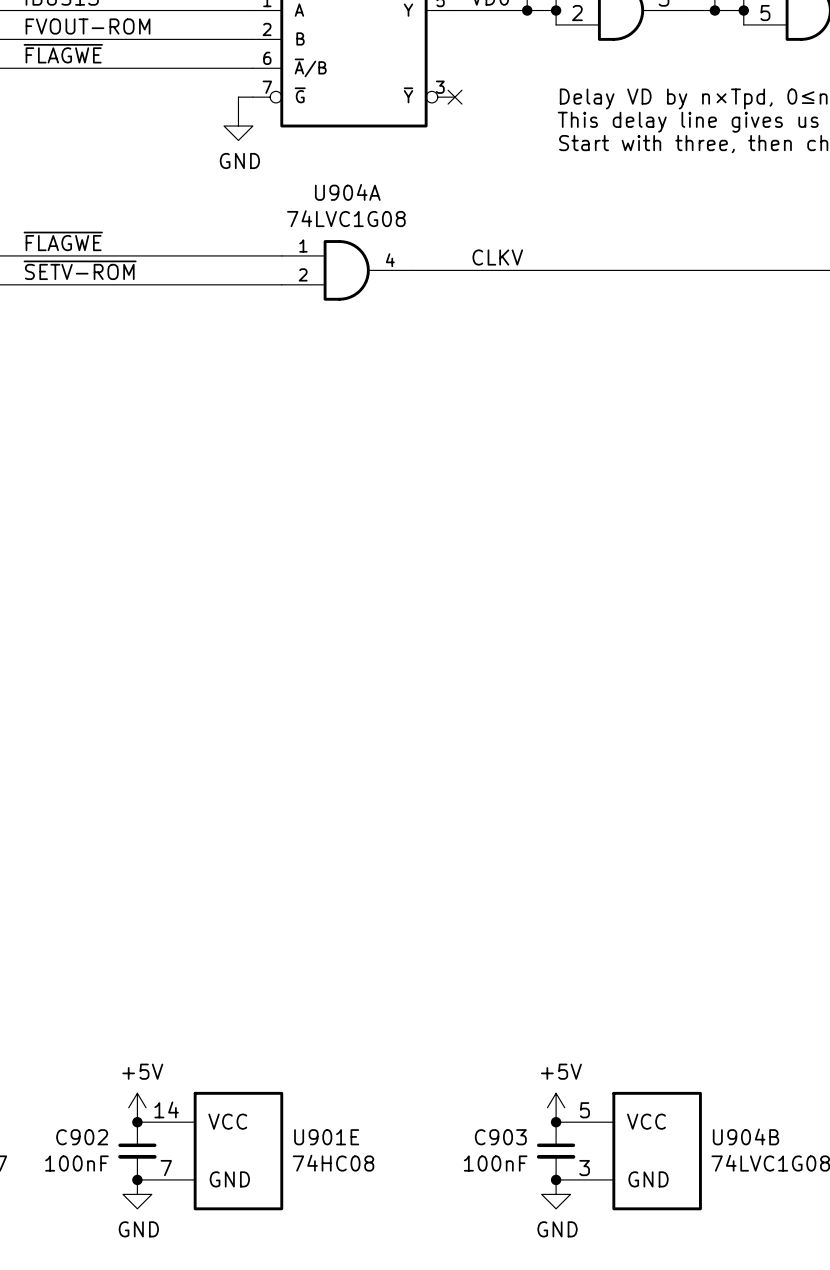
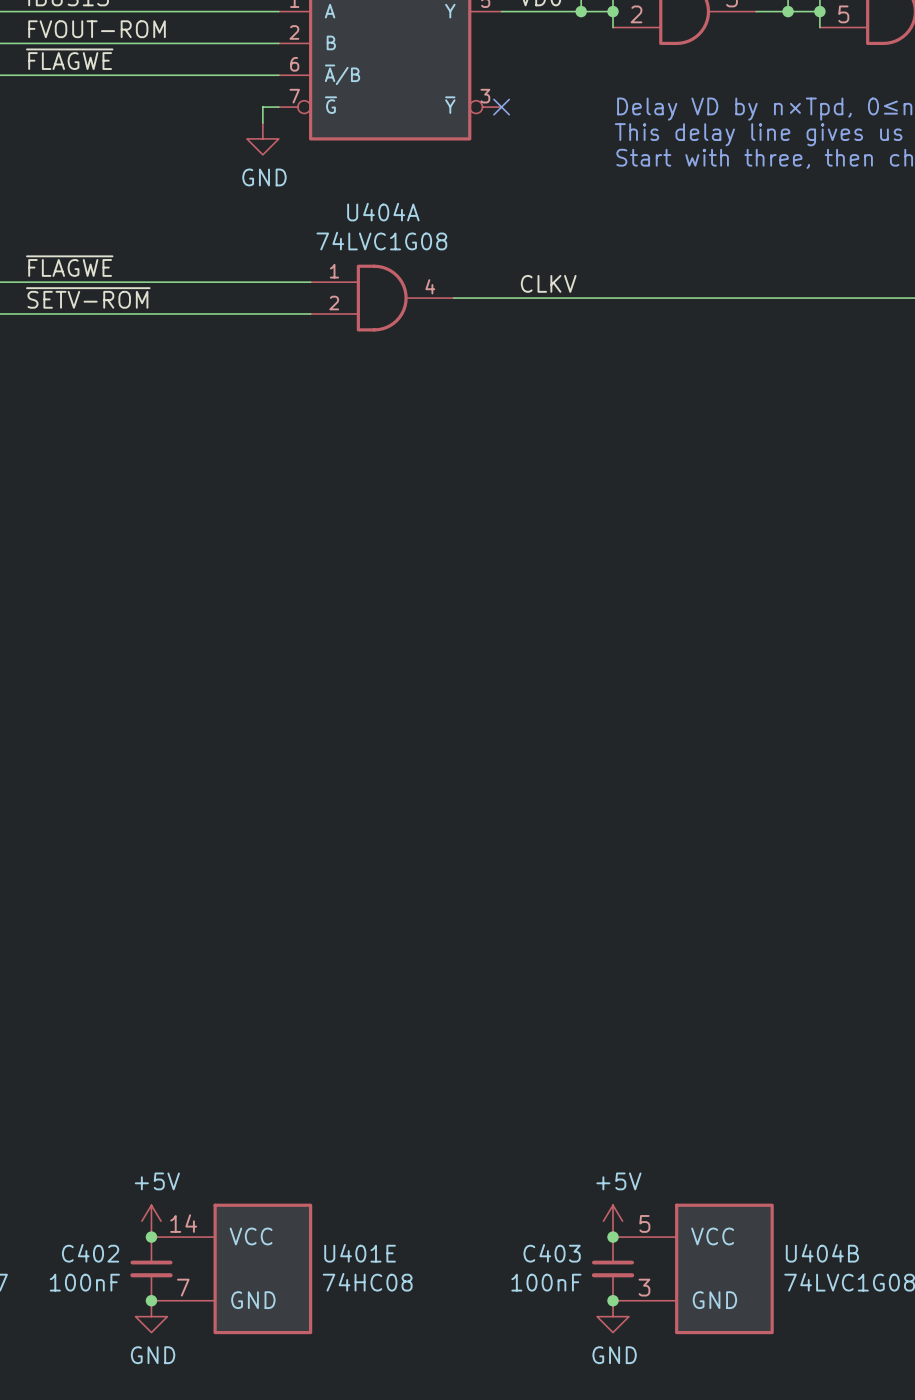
U904A name: U904A (347, 192) -> U404A (383, 212)
U904B name: U904B (746, 1136) -> U404B (822, 1253)
C902 name: C902 (82, 1137) -> C402 (90, 1253)
U901E name: U901E (326, 1137) -> U401E (360, 1253)
C903 name: C903 (500, 1137) -> C403 (552, 1253)

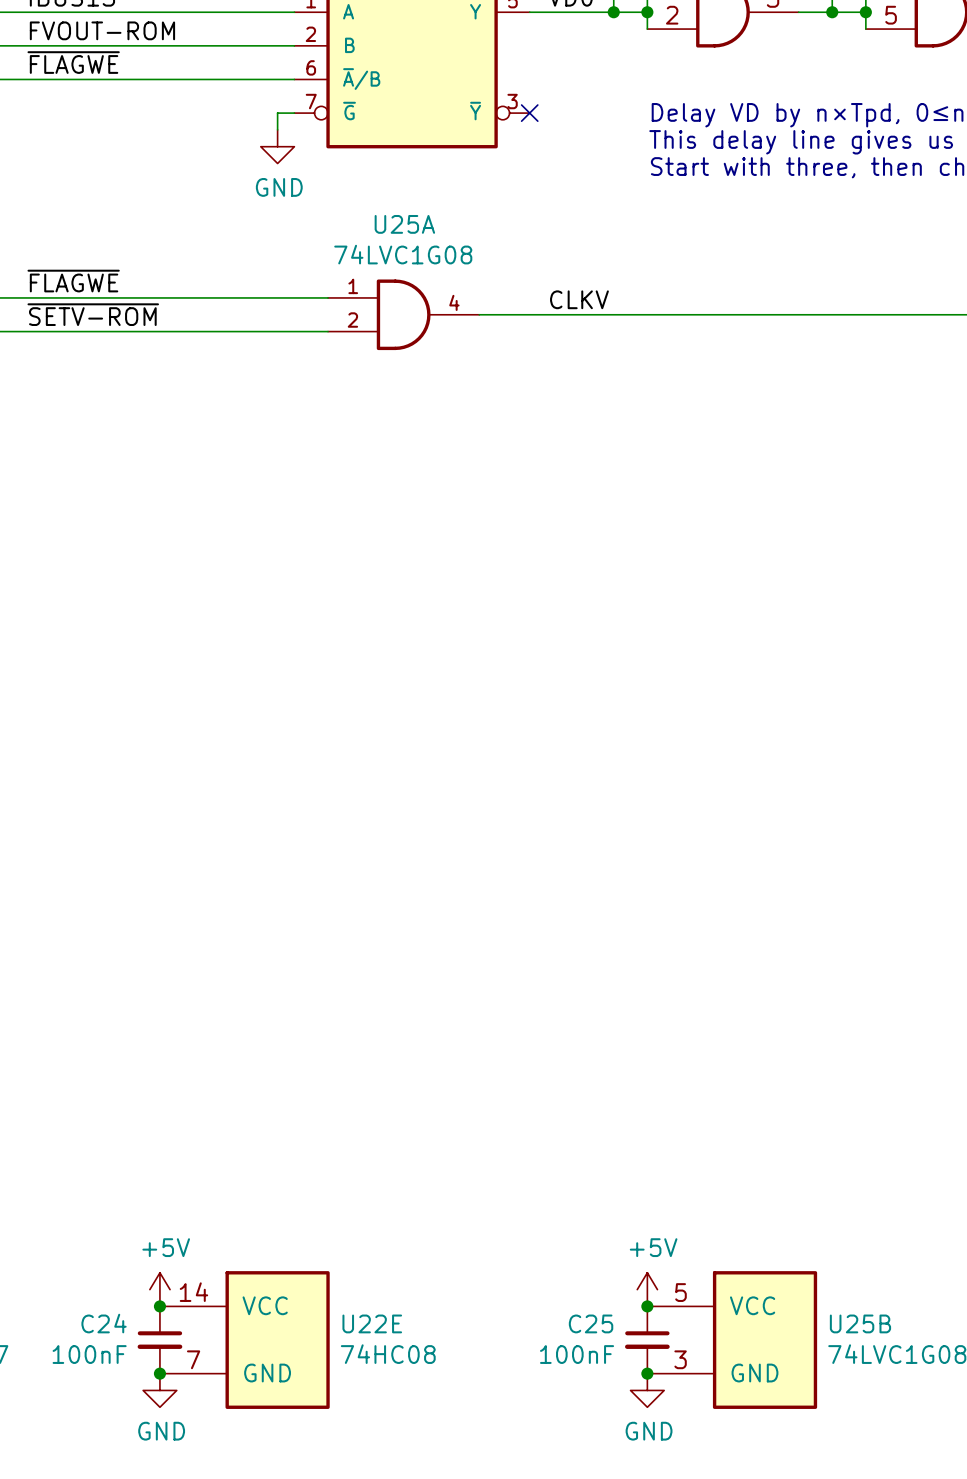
U404A name: U404A (383, 212) -> U25A (404, 224)
C402 name: C402 (90, 1253) -> C24 (104, 1323)
U401E name: U401E (360, 1253) -> U22E (372, 1323)
C403 name: C403 (552, 1253) -> C25 (591, 1323)
U404B name: U404B (822, 1253) -> U25B (860, 1323)

